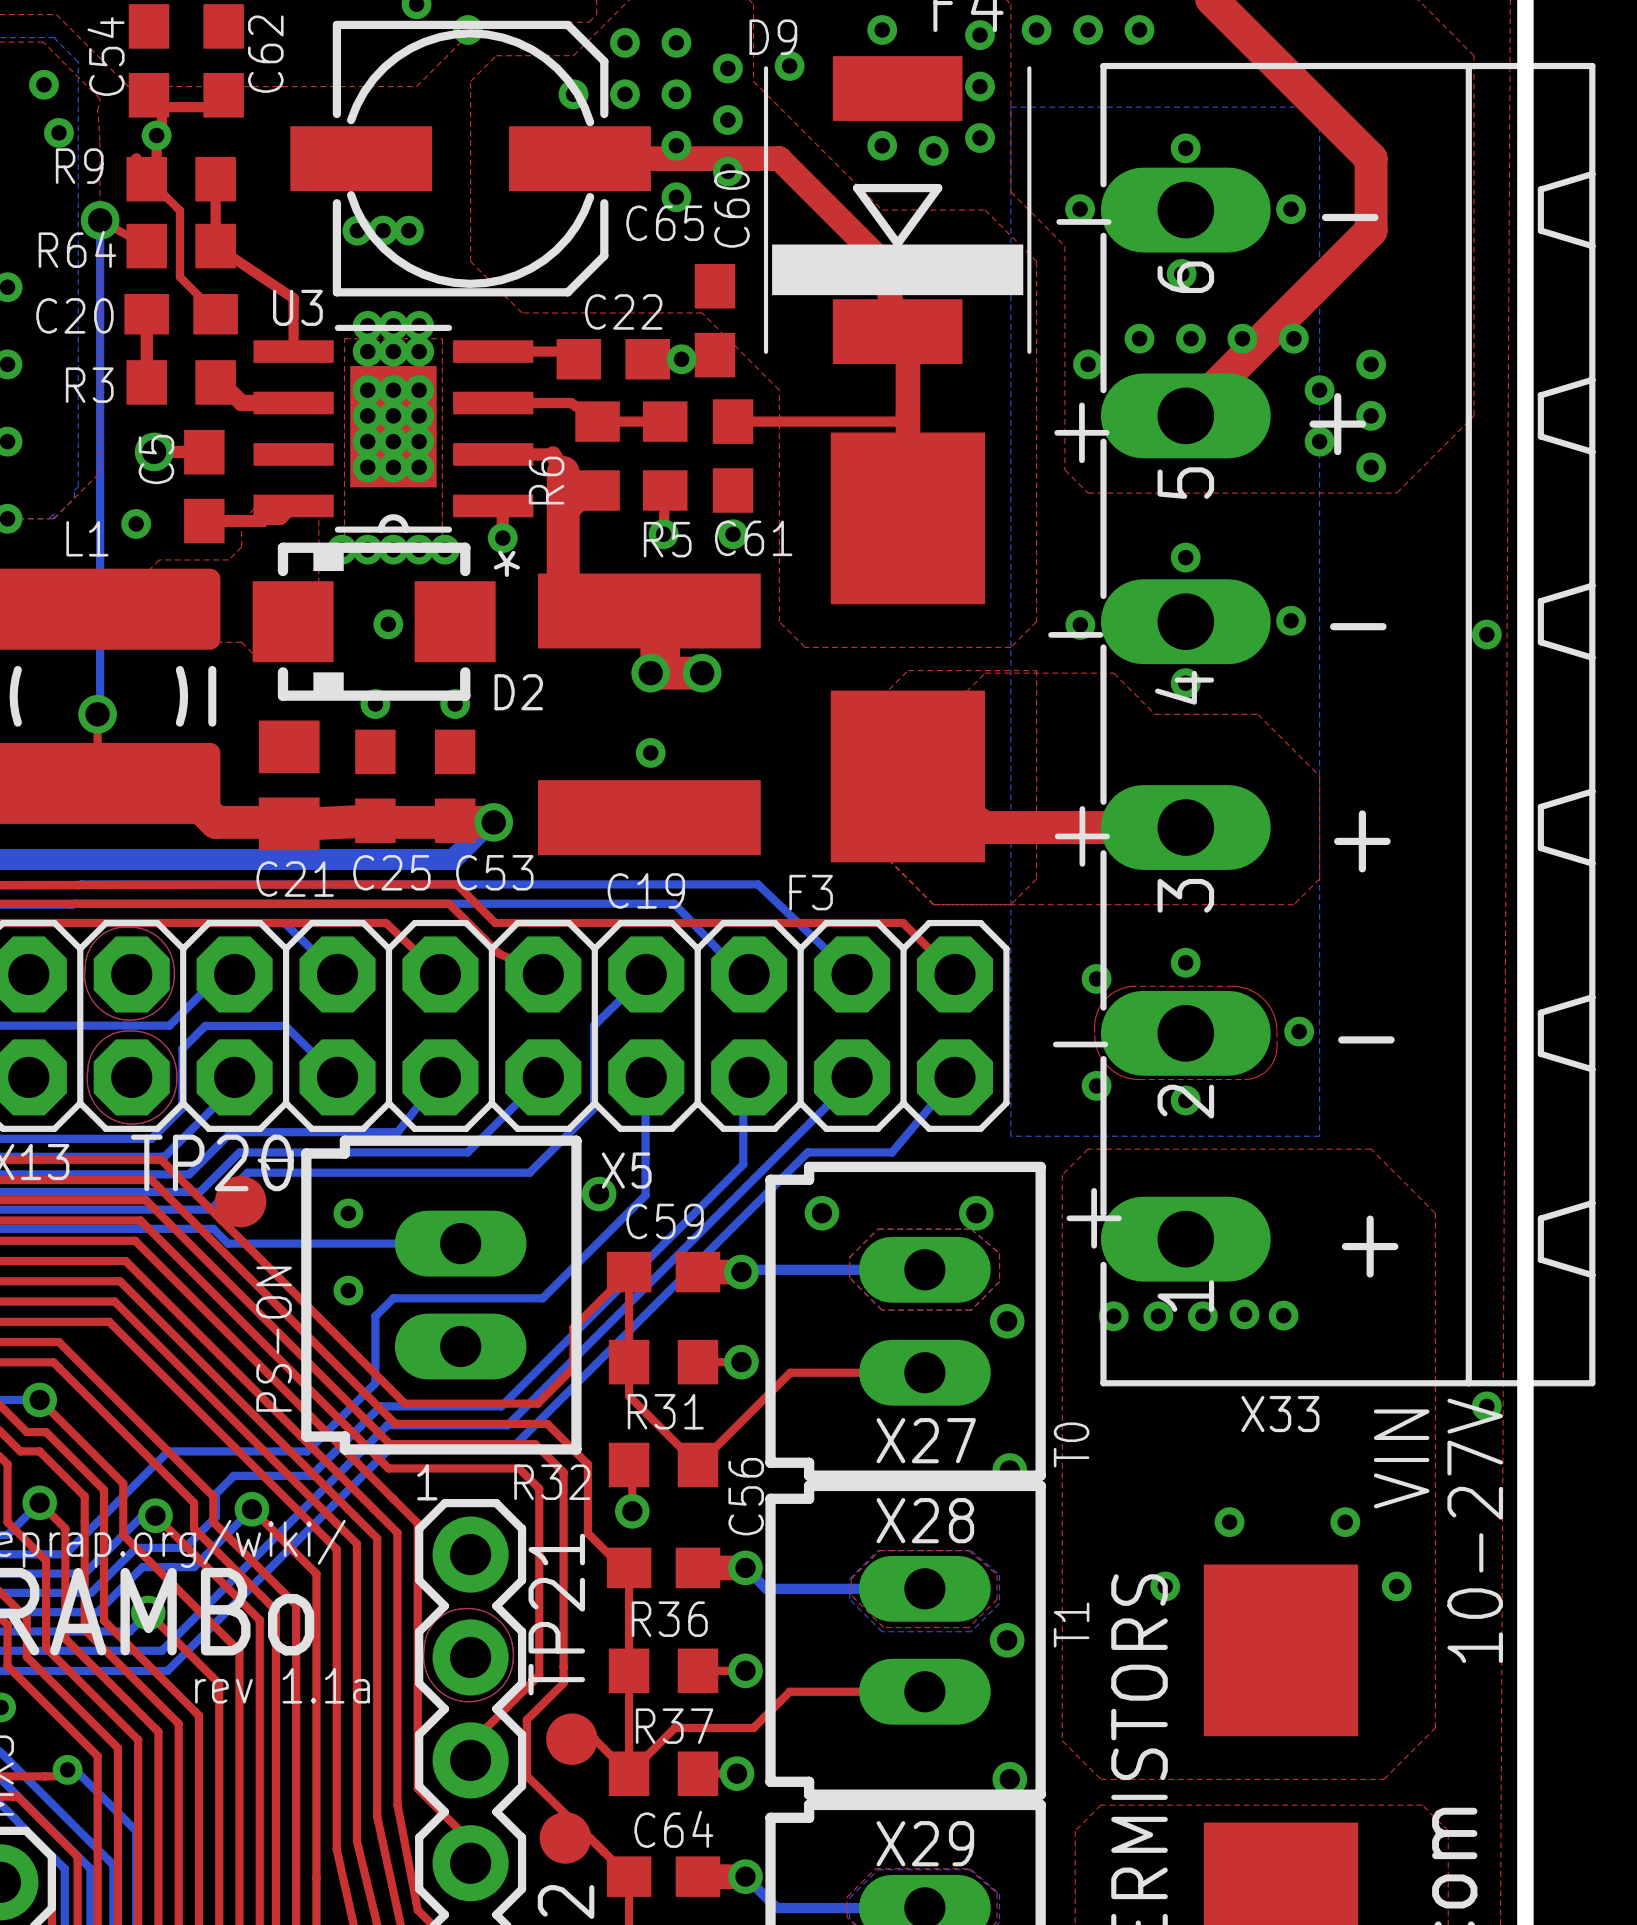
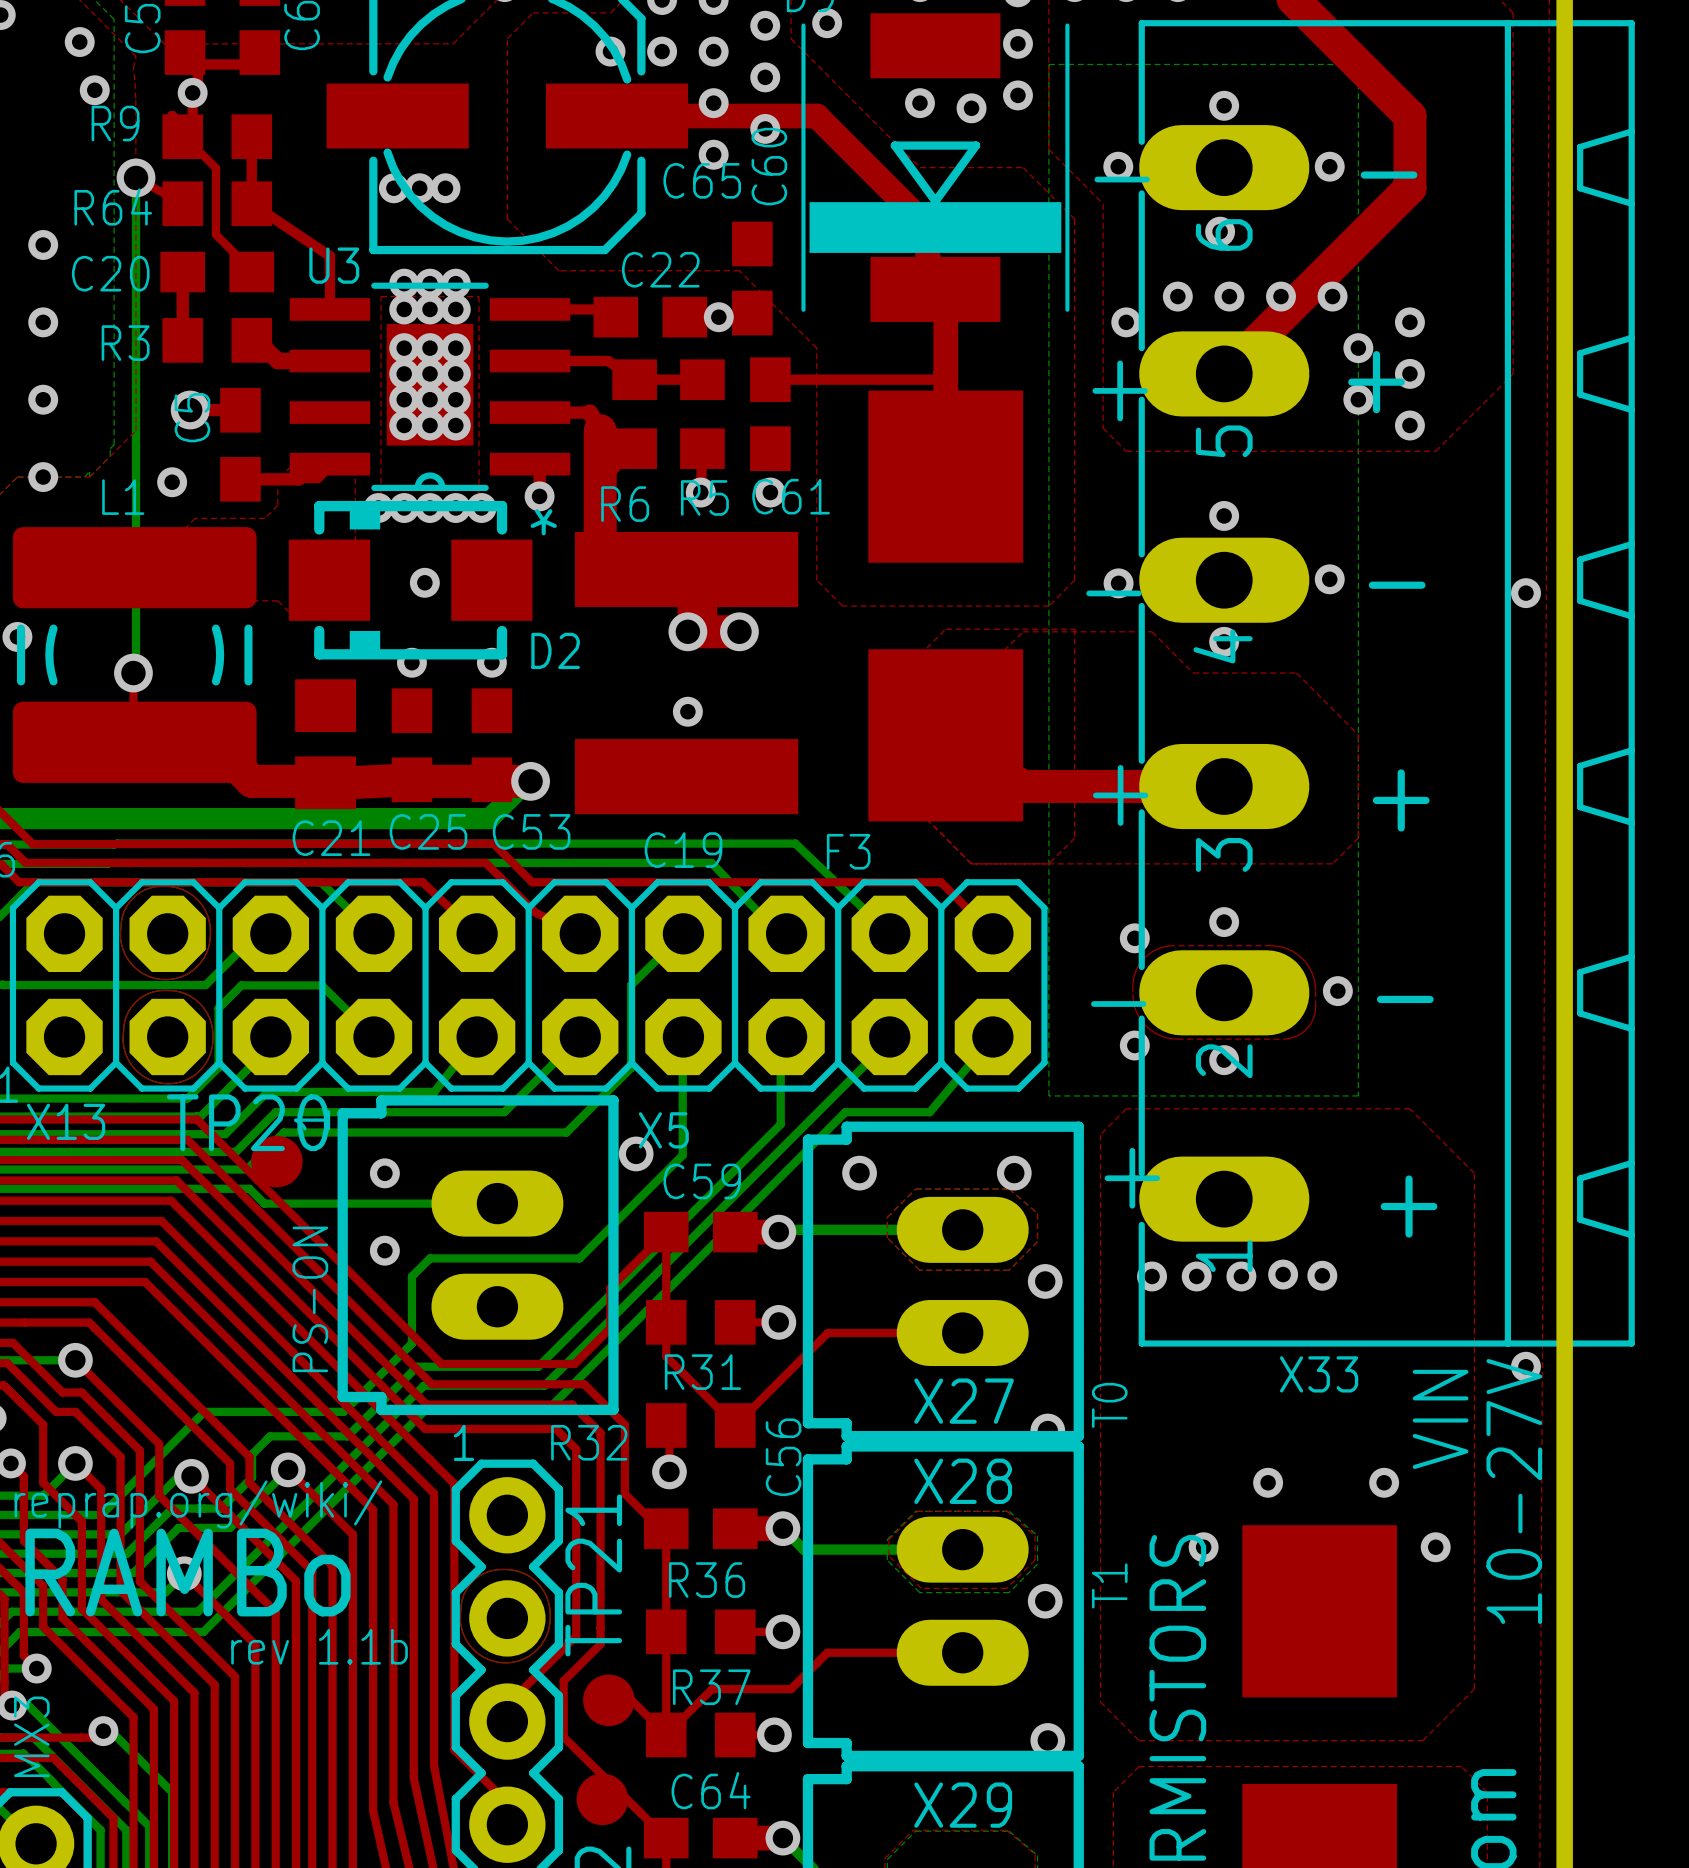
R6 name rotation: 0° (546, 480) -> 90° clockwise (625, 504)
R6 name position: R6 (546, 480) -> R6 (625, 504)
text: rev 1.1a (282, 1685) -> rev 1.1b (319, 1646)

